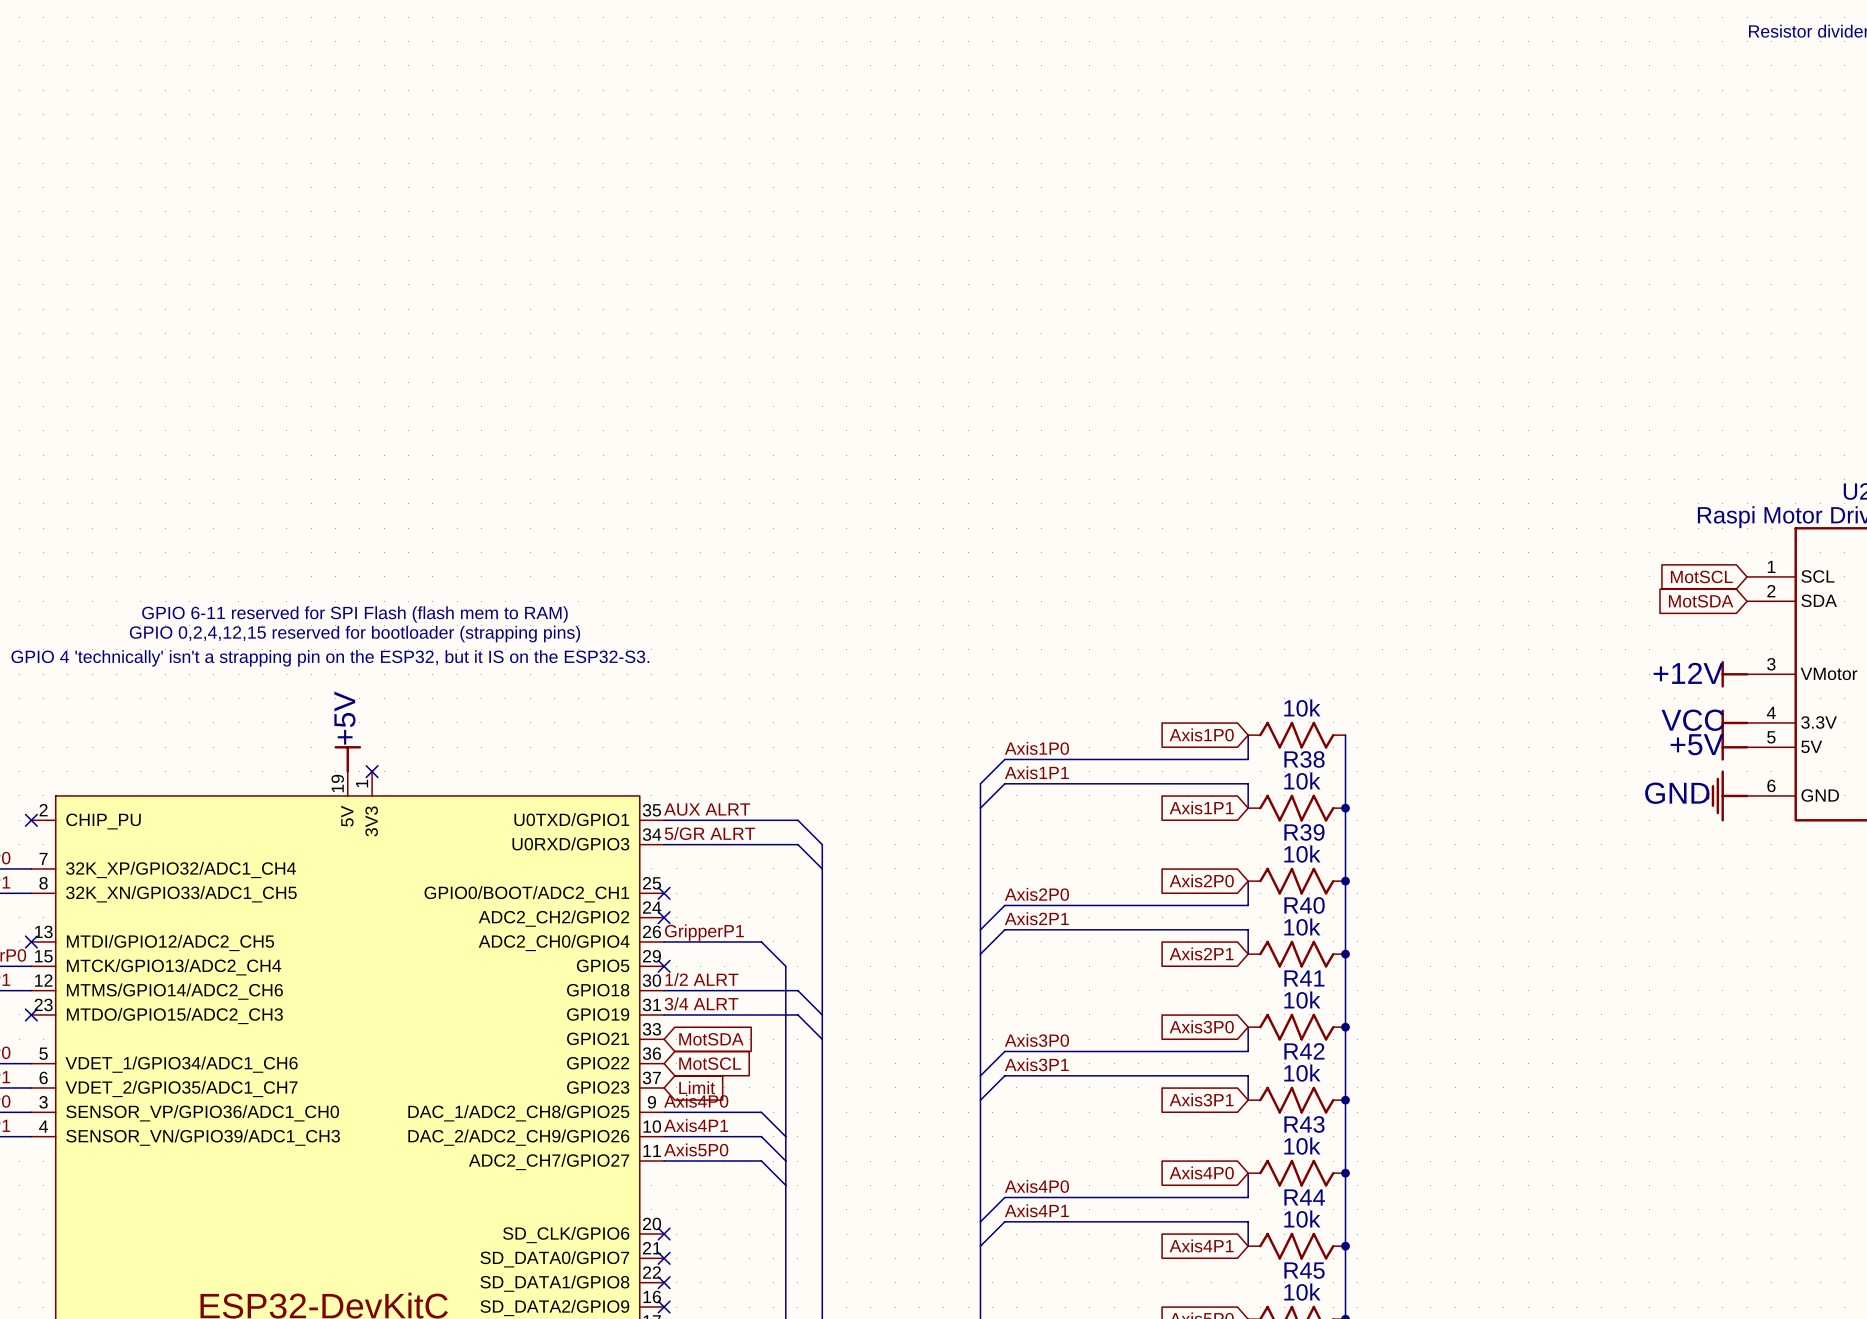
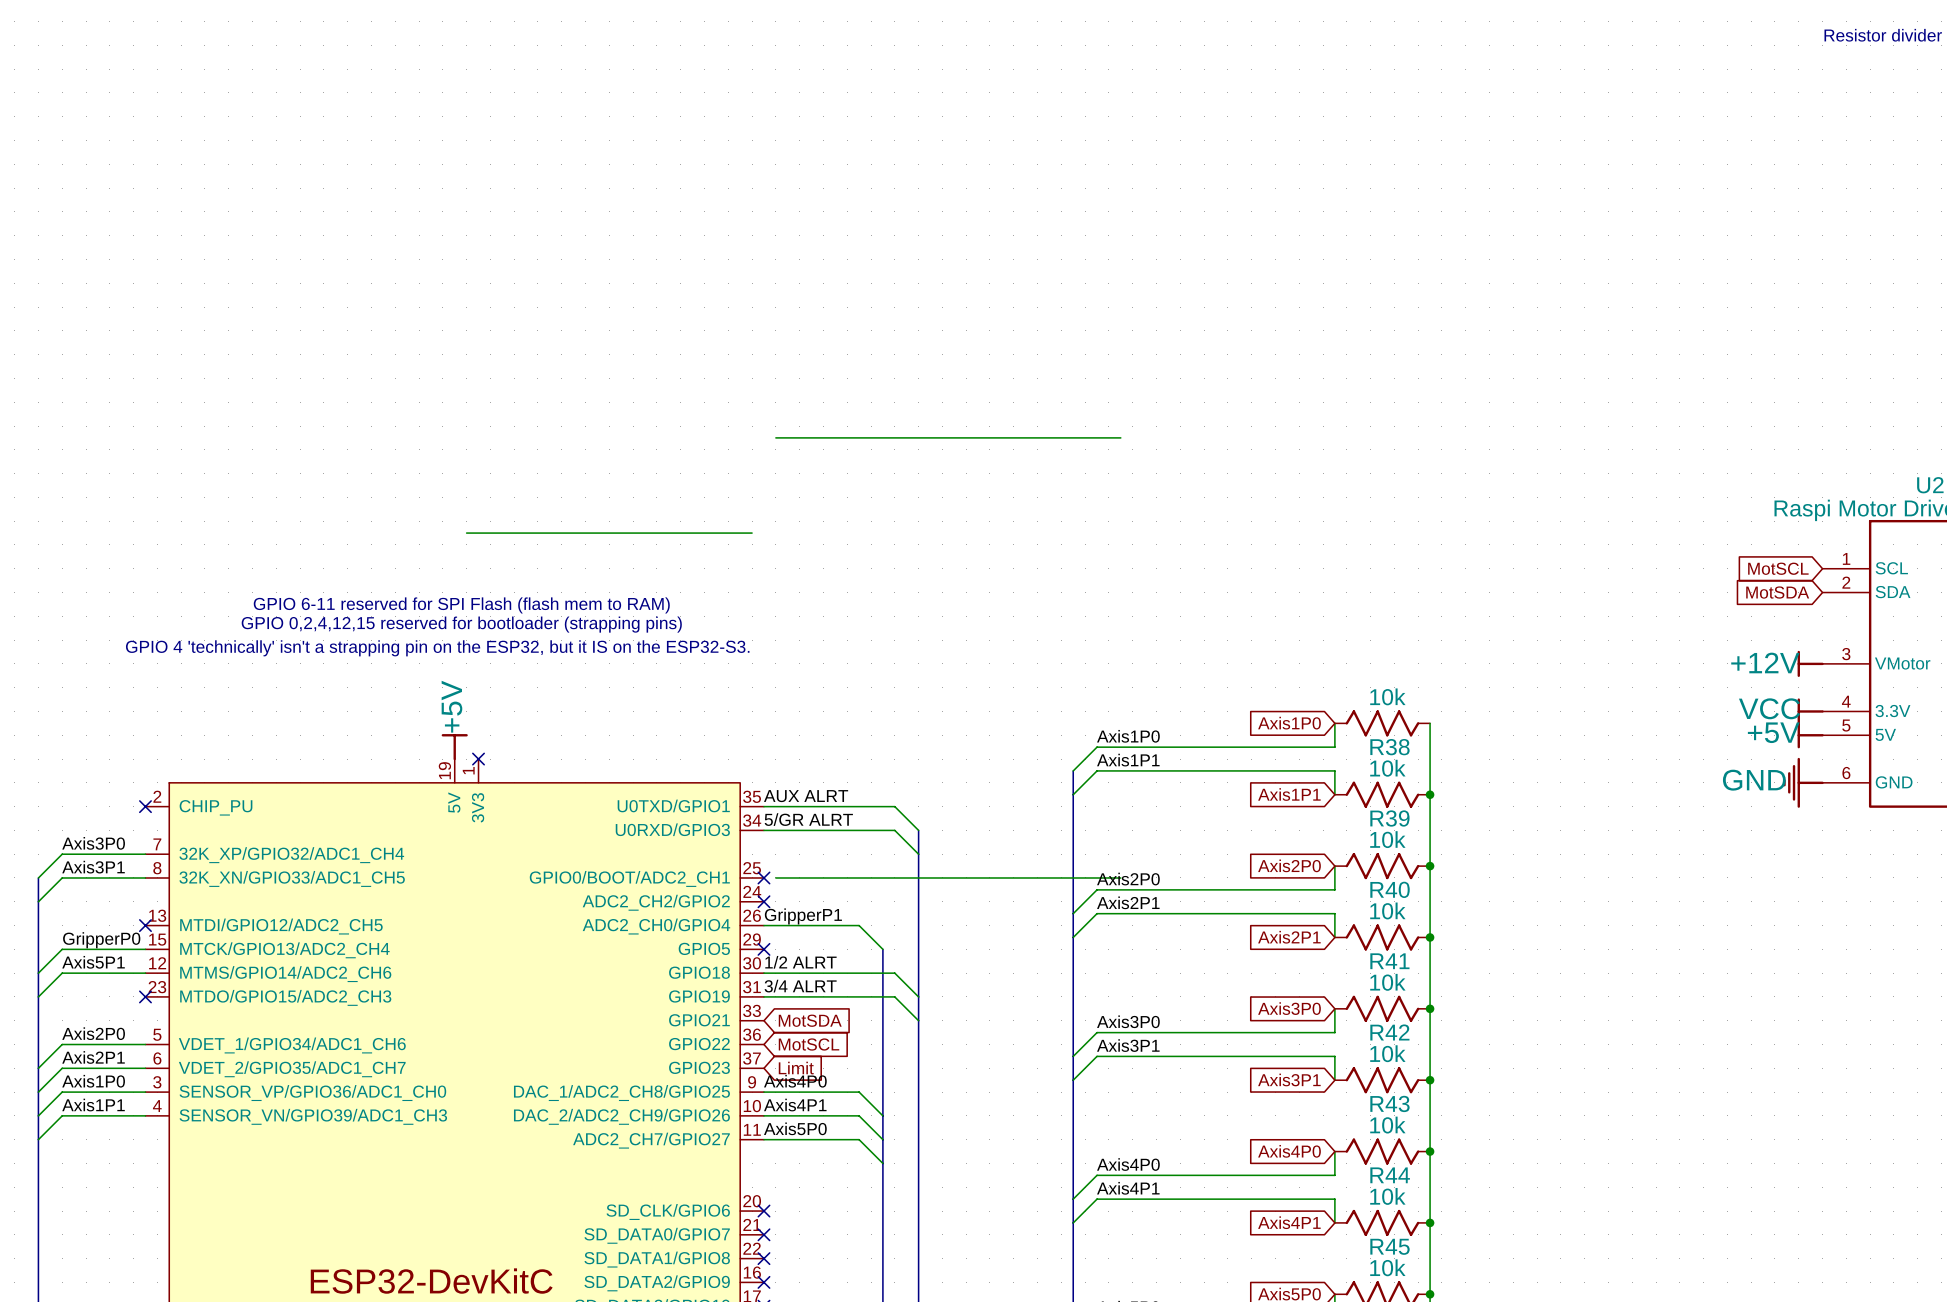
wire: none -> (775, 437) (1120, 437)
wire: none -> (466, 533) (752, 533)
wire: none -> (775, 877) (1120, 877)

